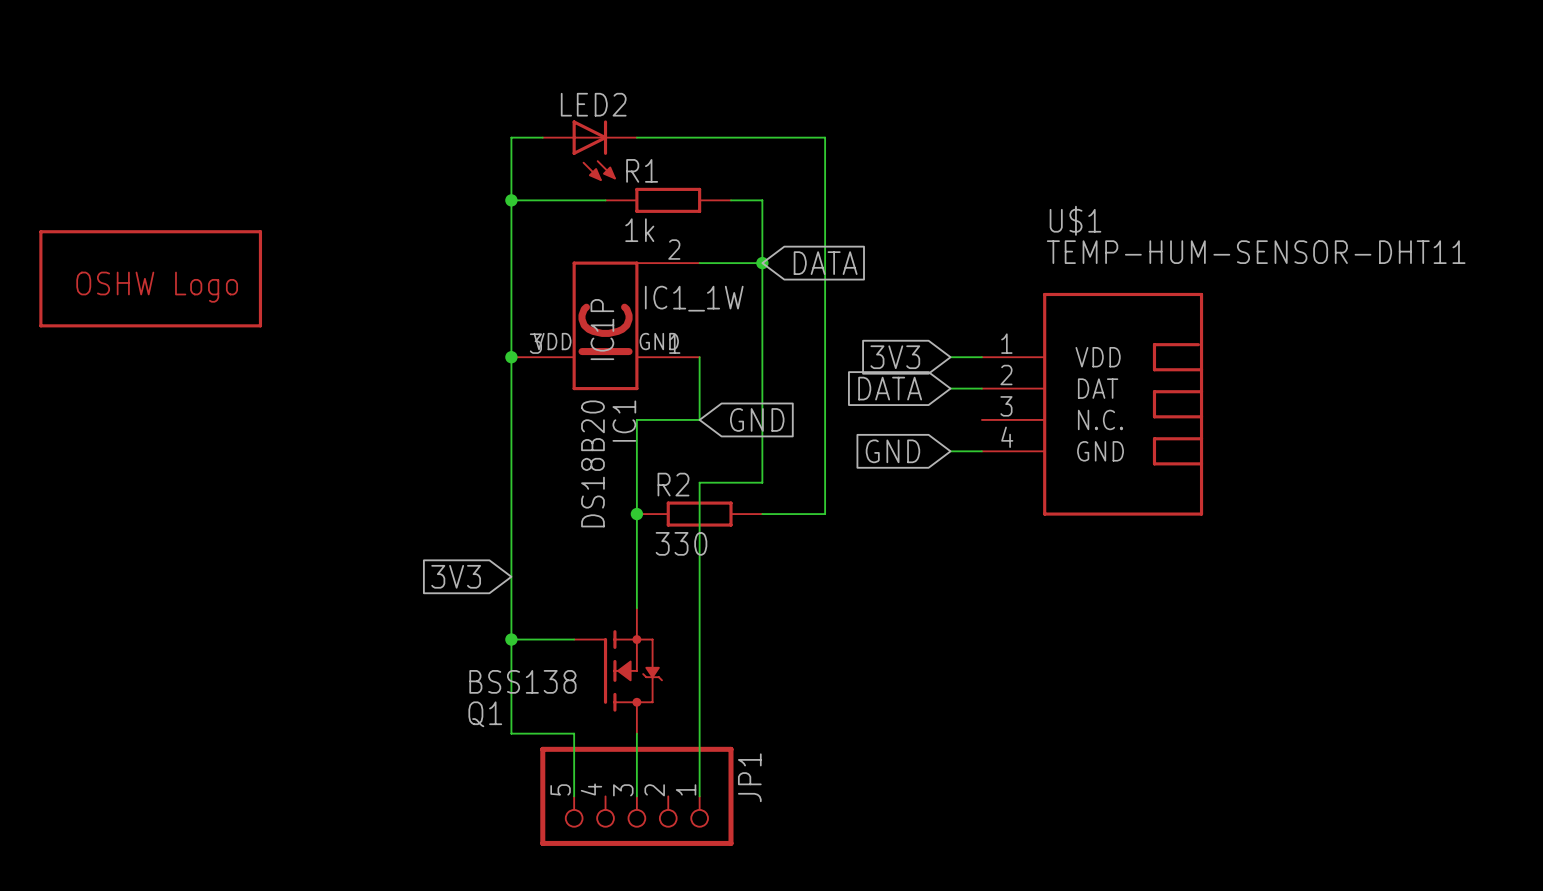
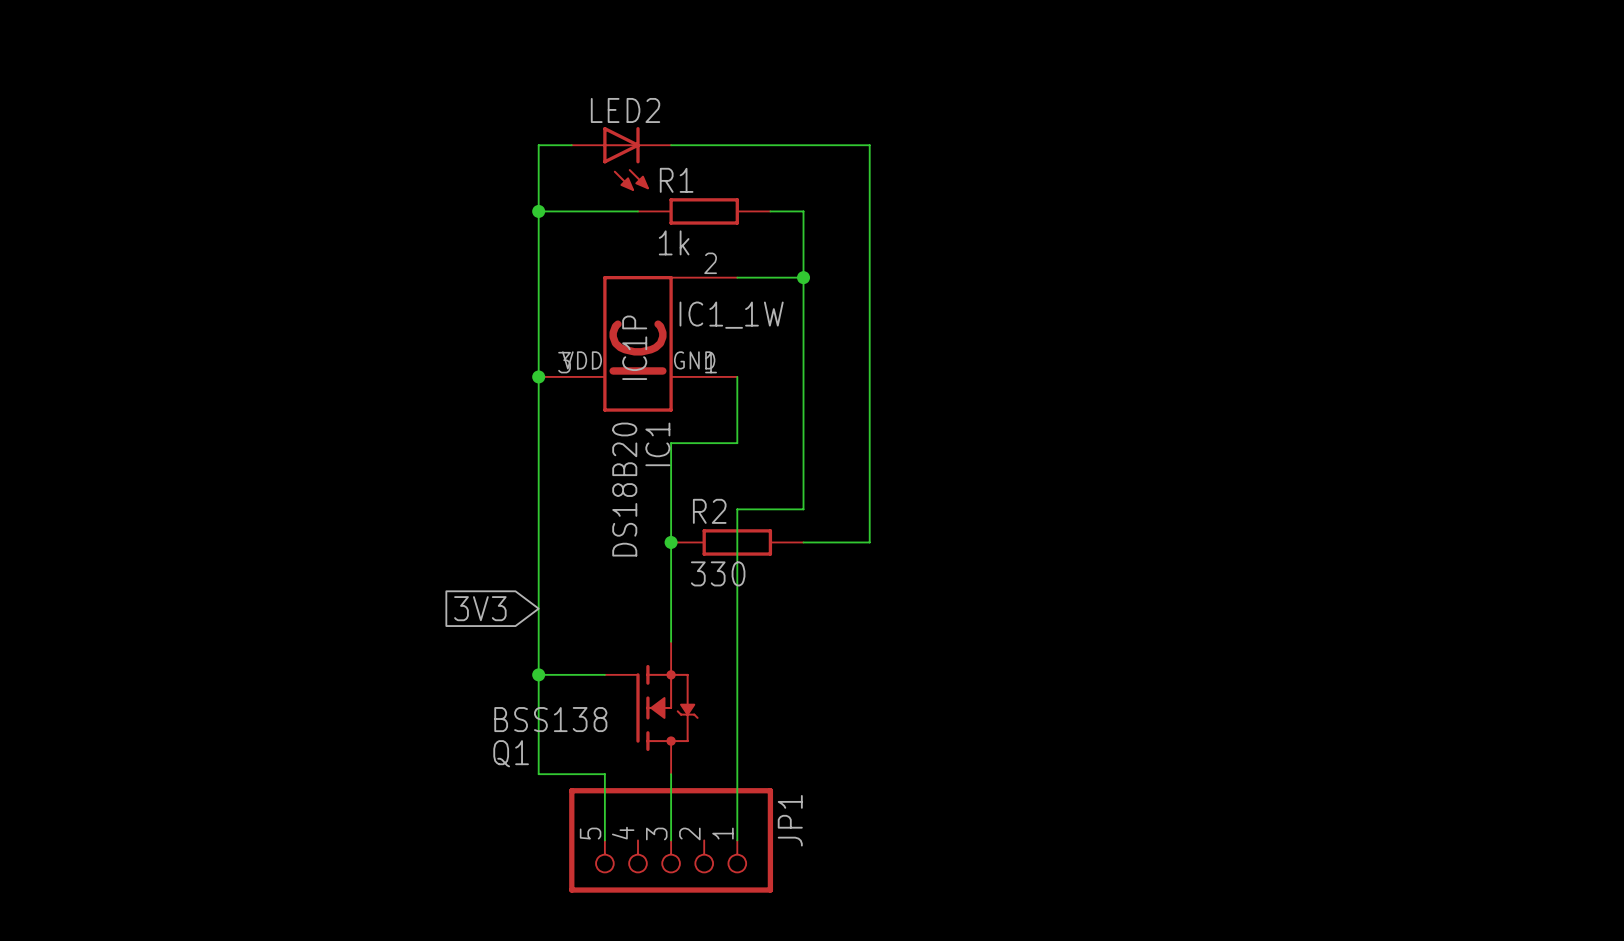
global label: DATA (825, 263) -> none
part: (150, 278) -> none
global label: 3V3 (895, 357) -> none
wire: (950, 357) (981, 357) -> none
global label: DATA (890, 388) -> none
wire: (950, 388) (981, 388) -> none
U$1: TEMP-HUM-SENSOR-DHT11 (1092, 404) -> none
global label: GND (757, 419) -> none
global label: GND (892, 451) -> none
wire: (950, 451) (981, 451) -> none

